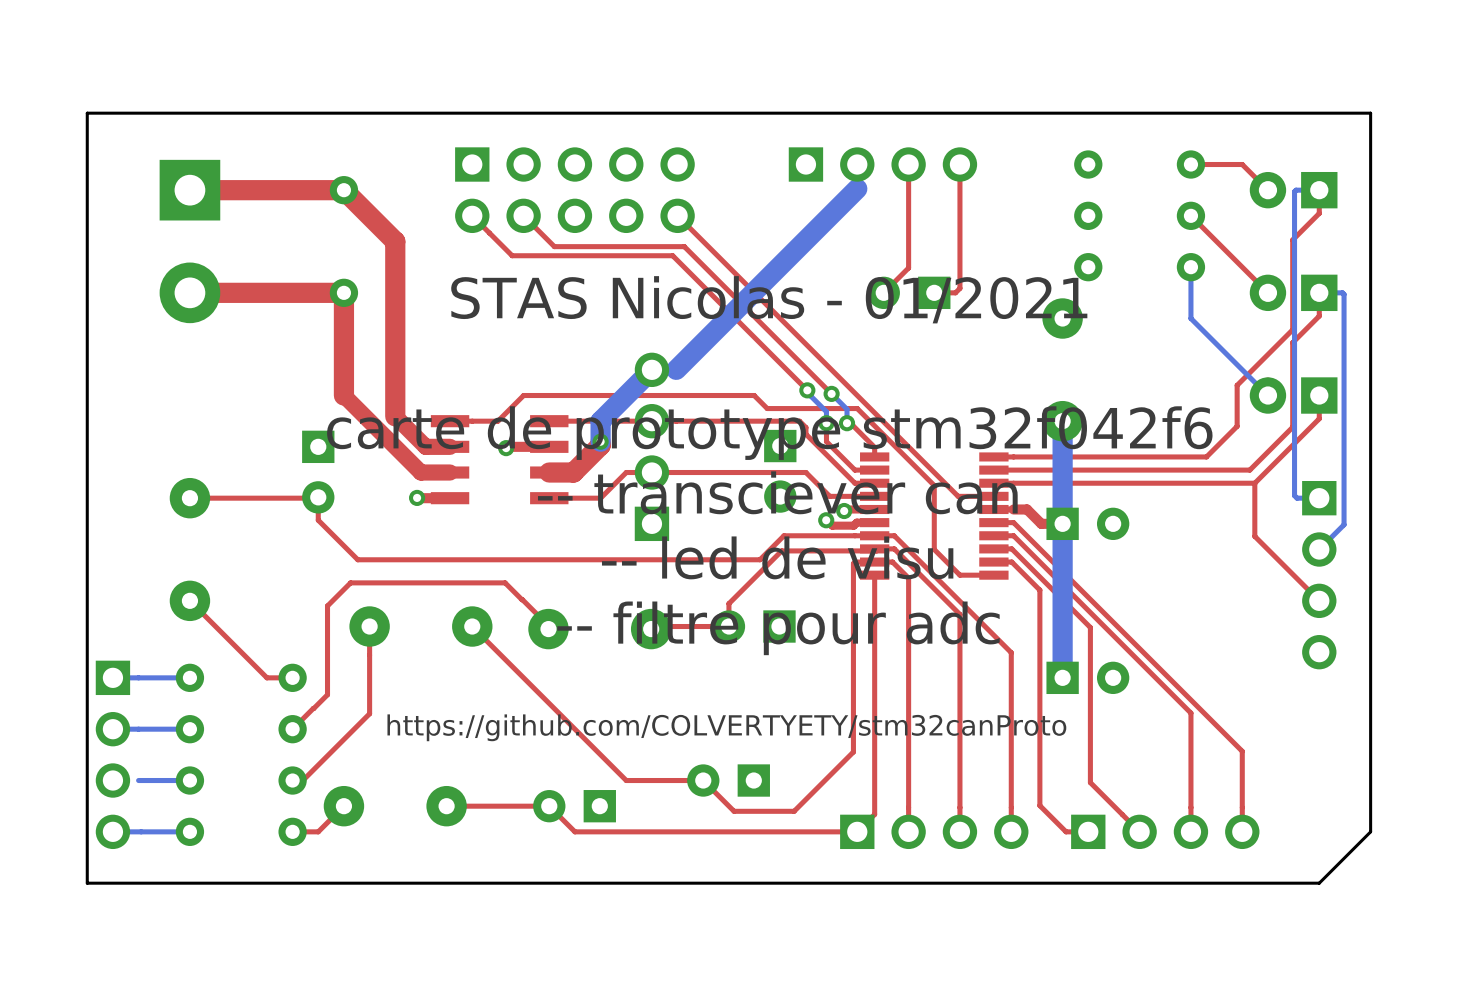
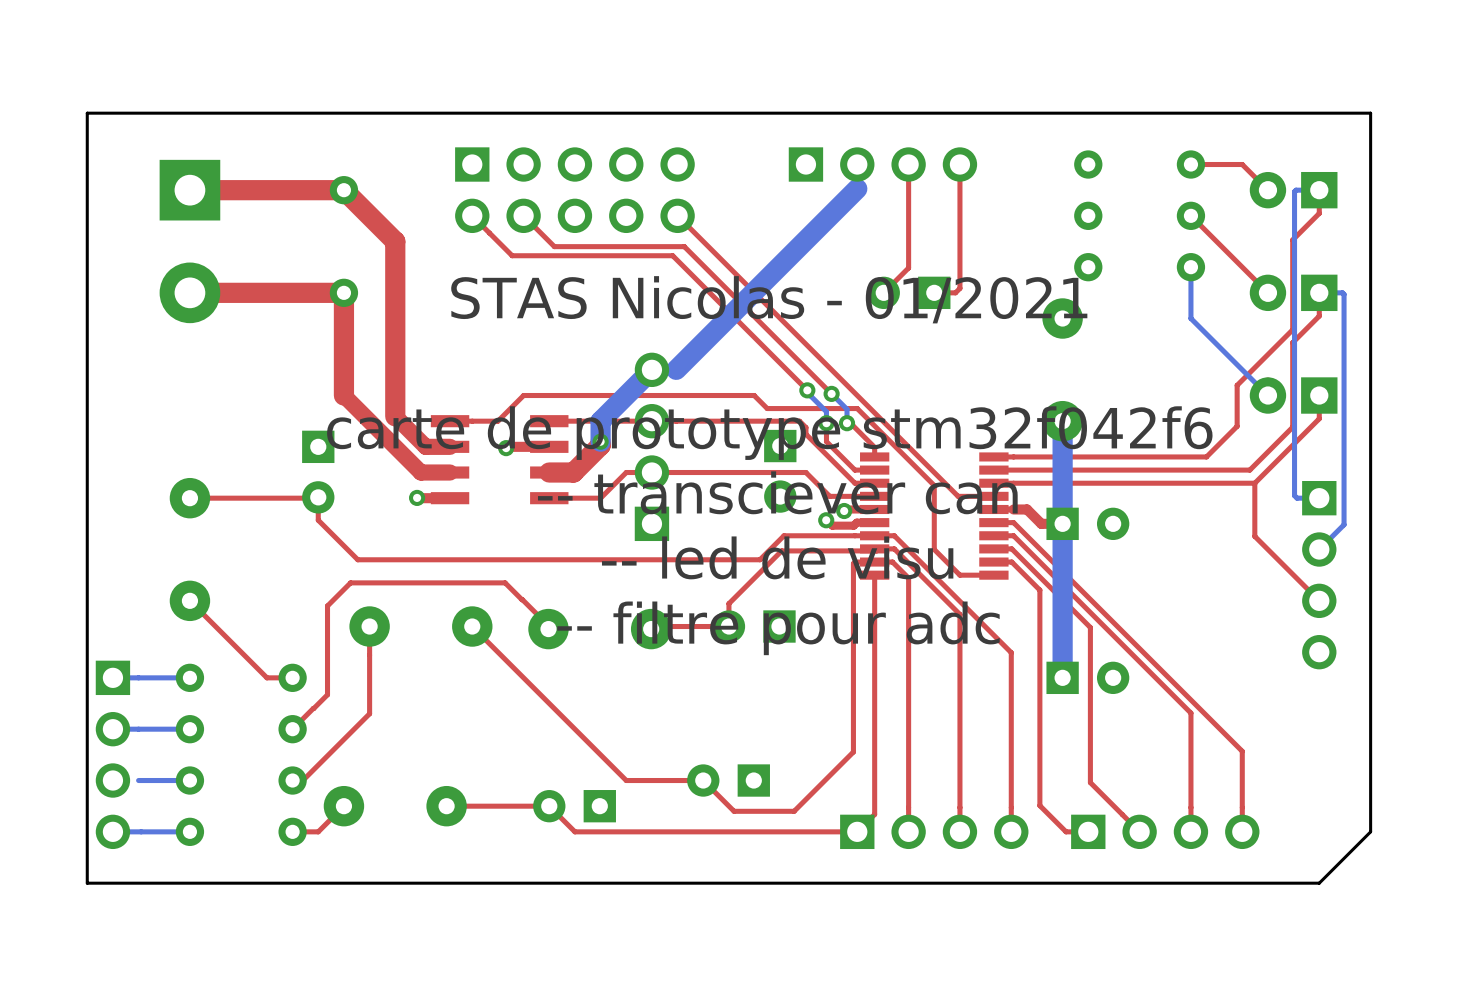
text: https://github.com/COLVERTYETY/stm32canProto (726, 727) -> none

